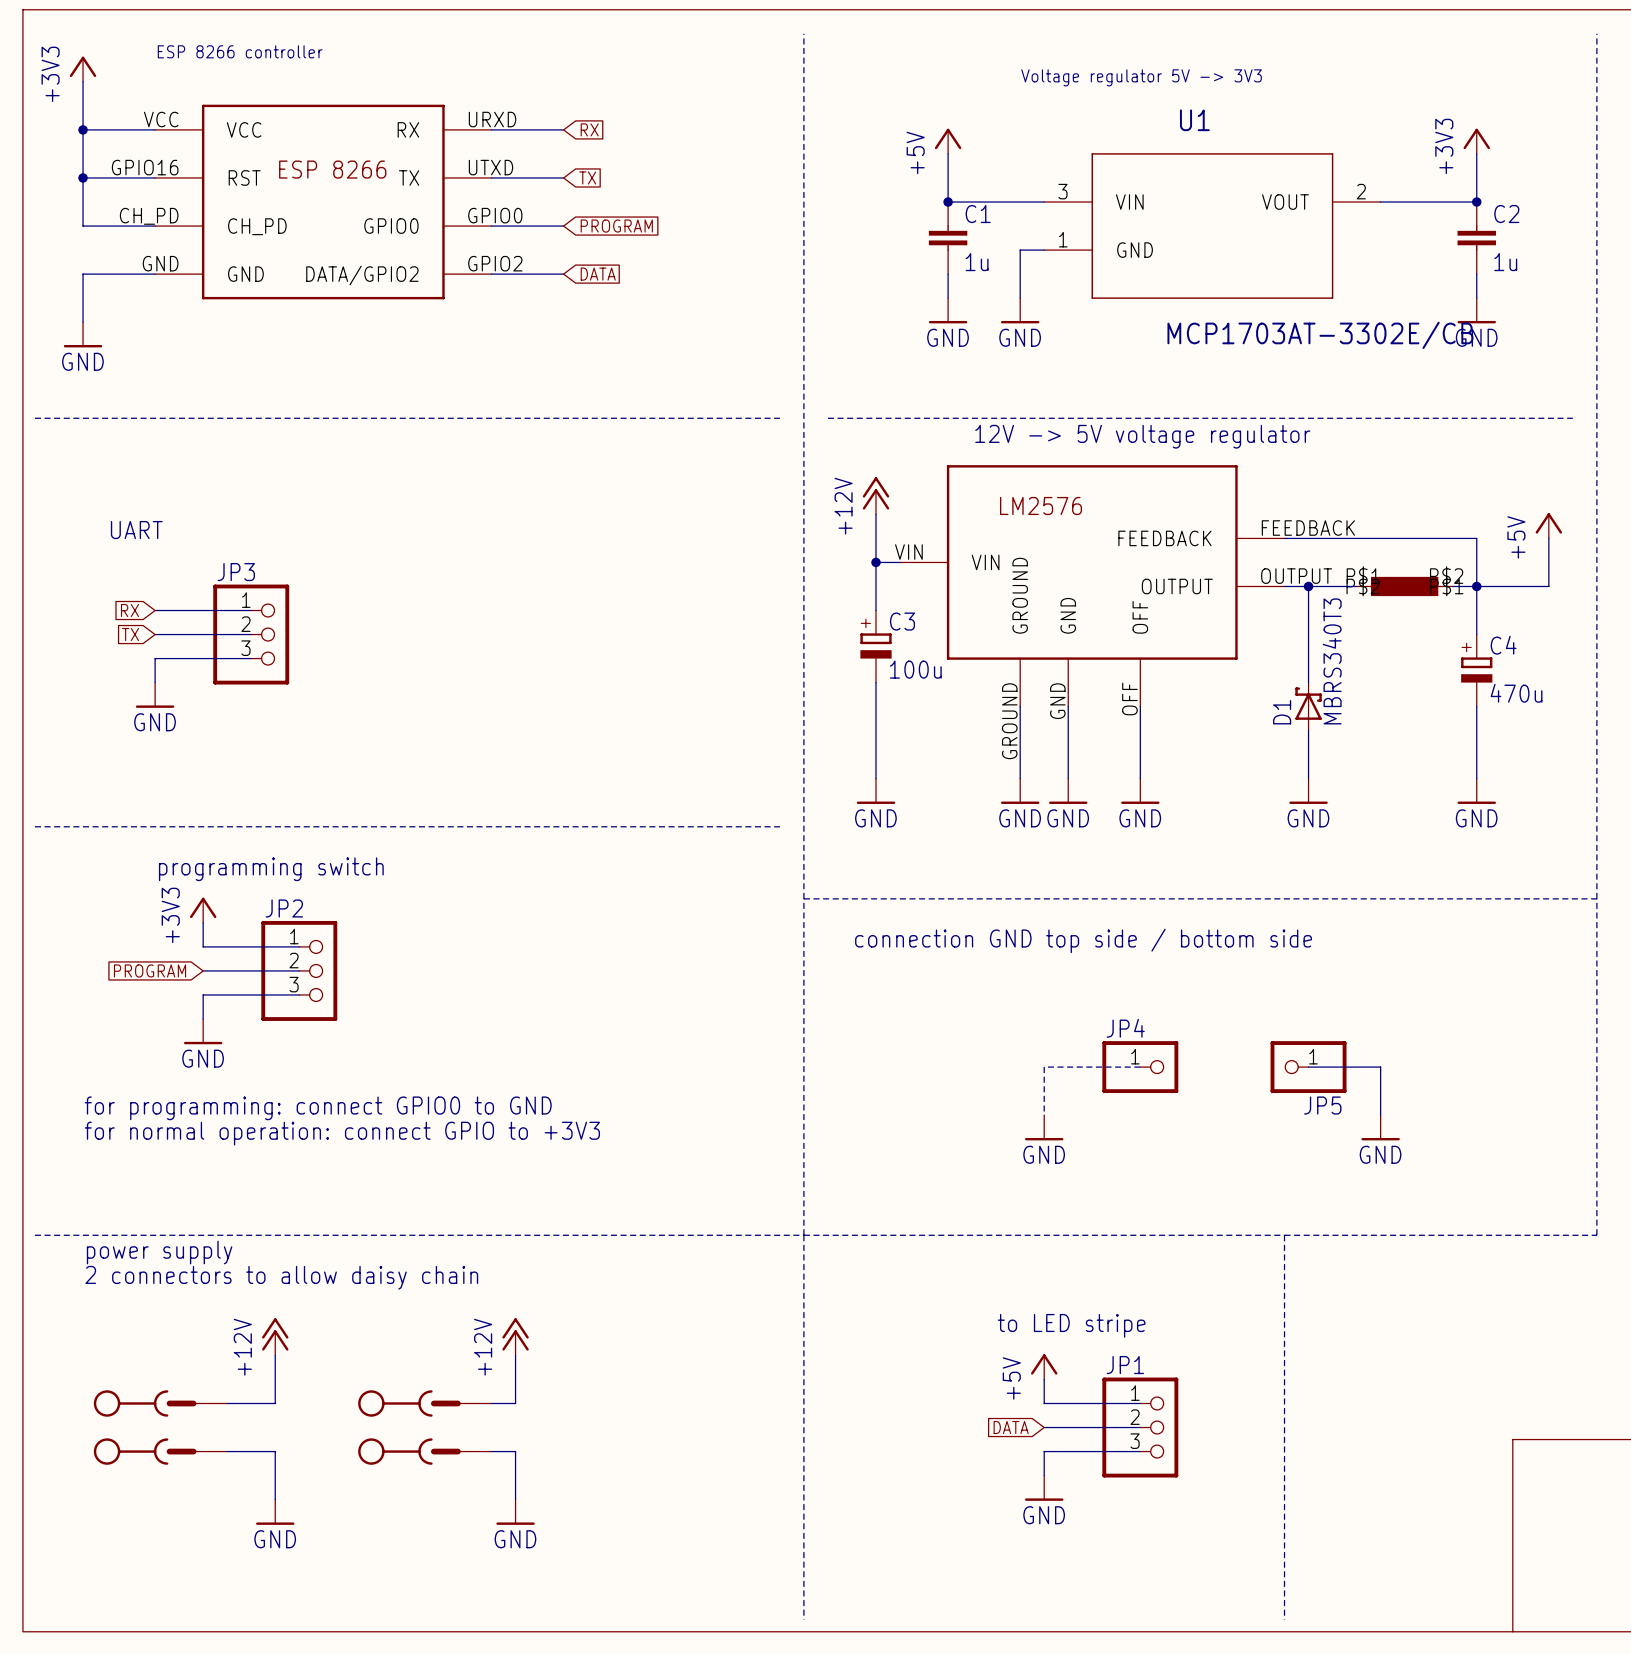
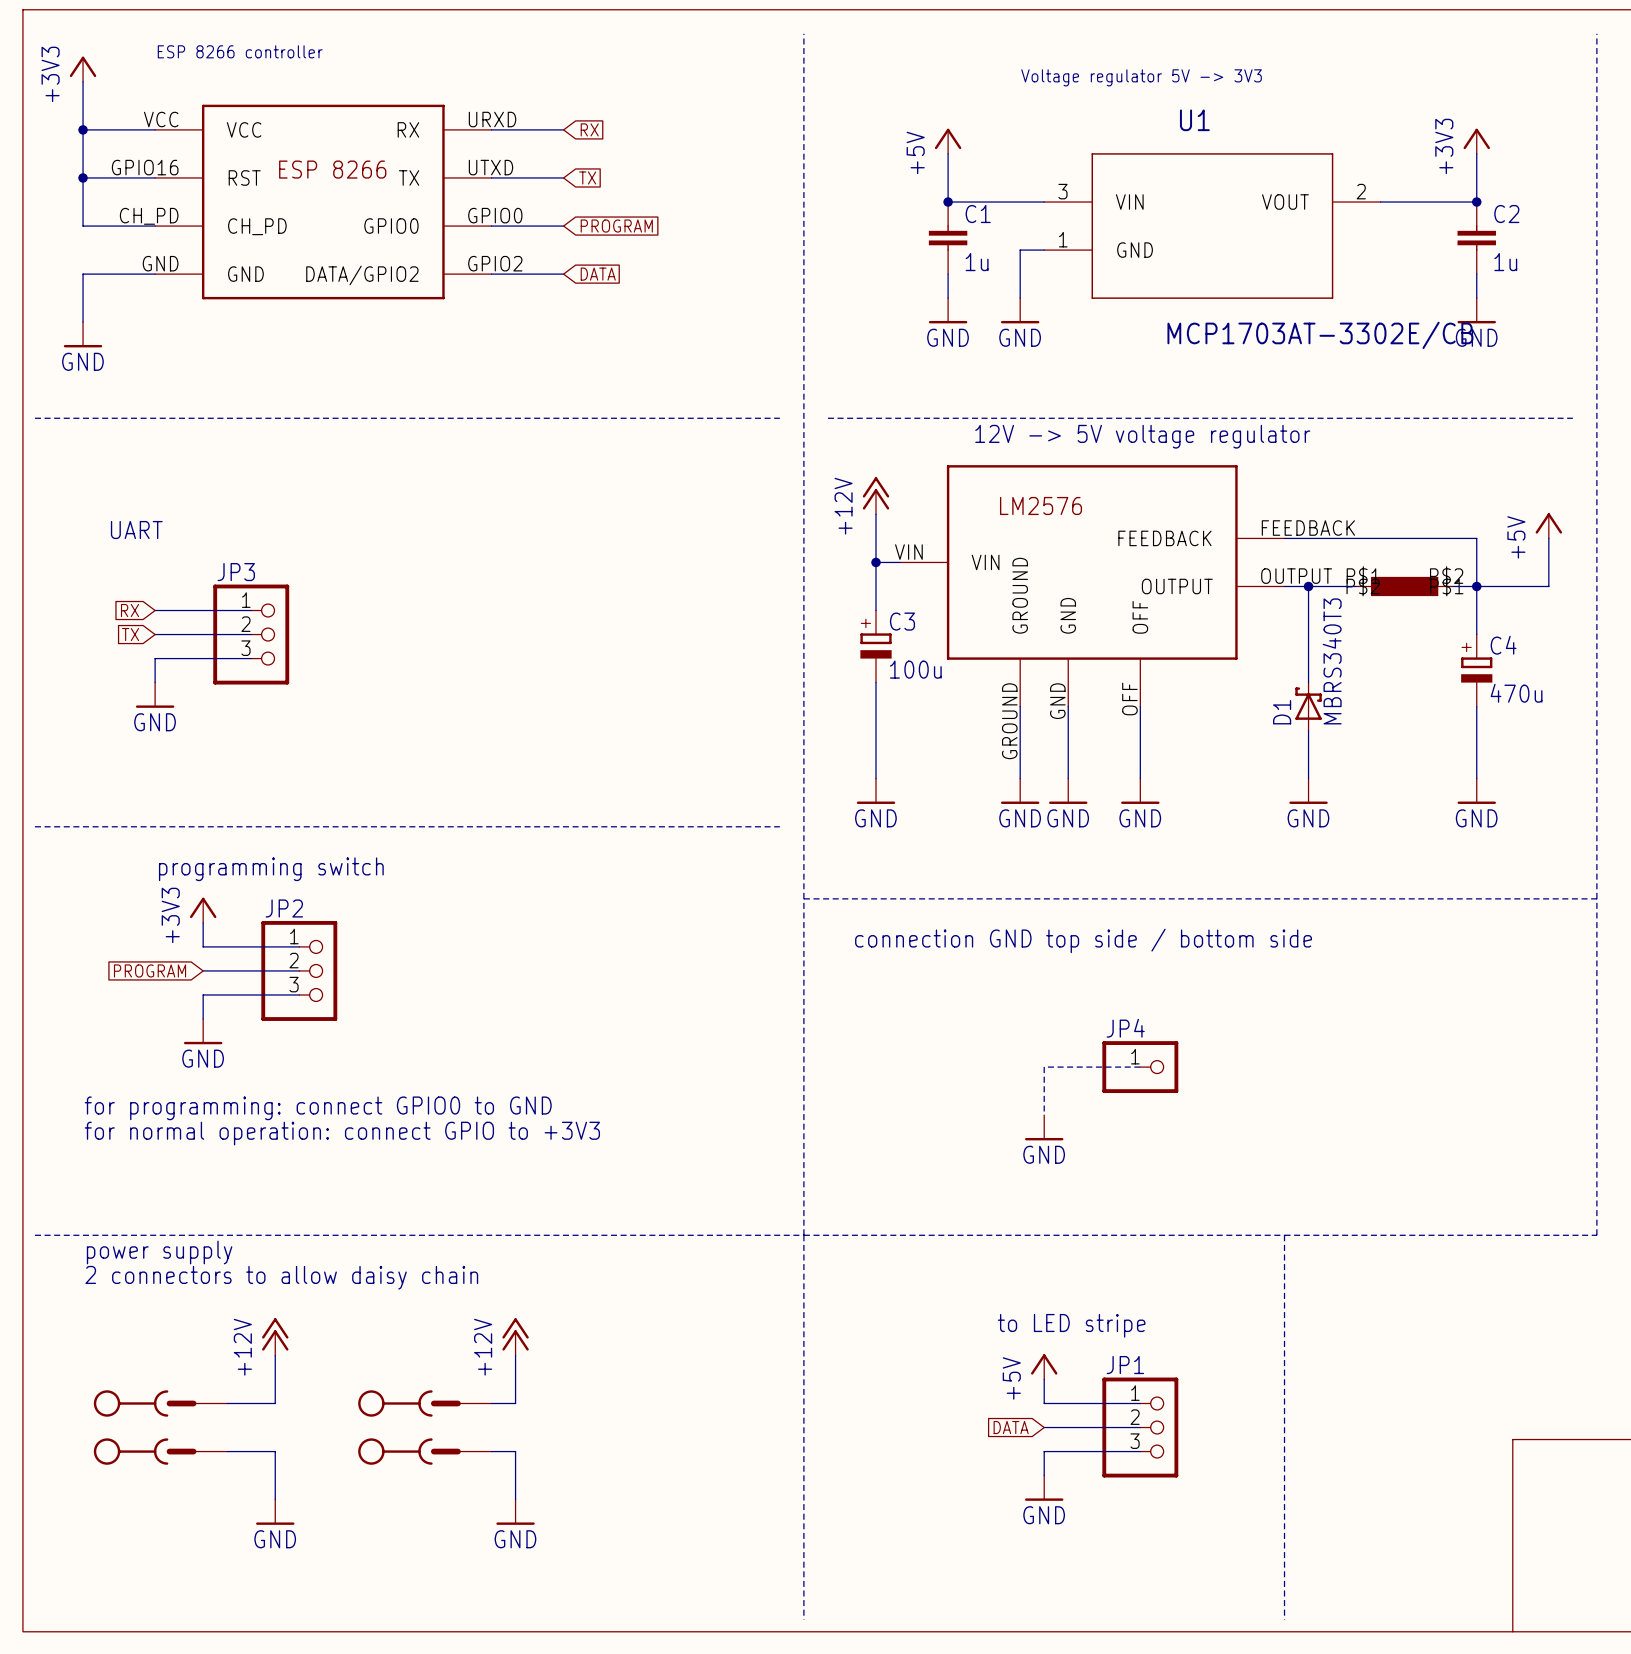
wire: (1308, 1067) (1380, 1067) (1380, 1115) -> none
JP5: (1308, 1067) -> none
power symbol: GND (1380, 1127) -> none

